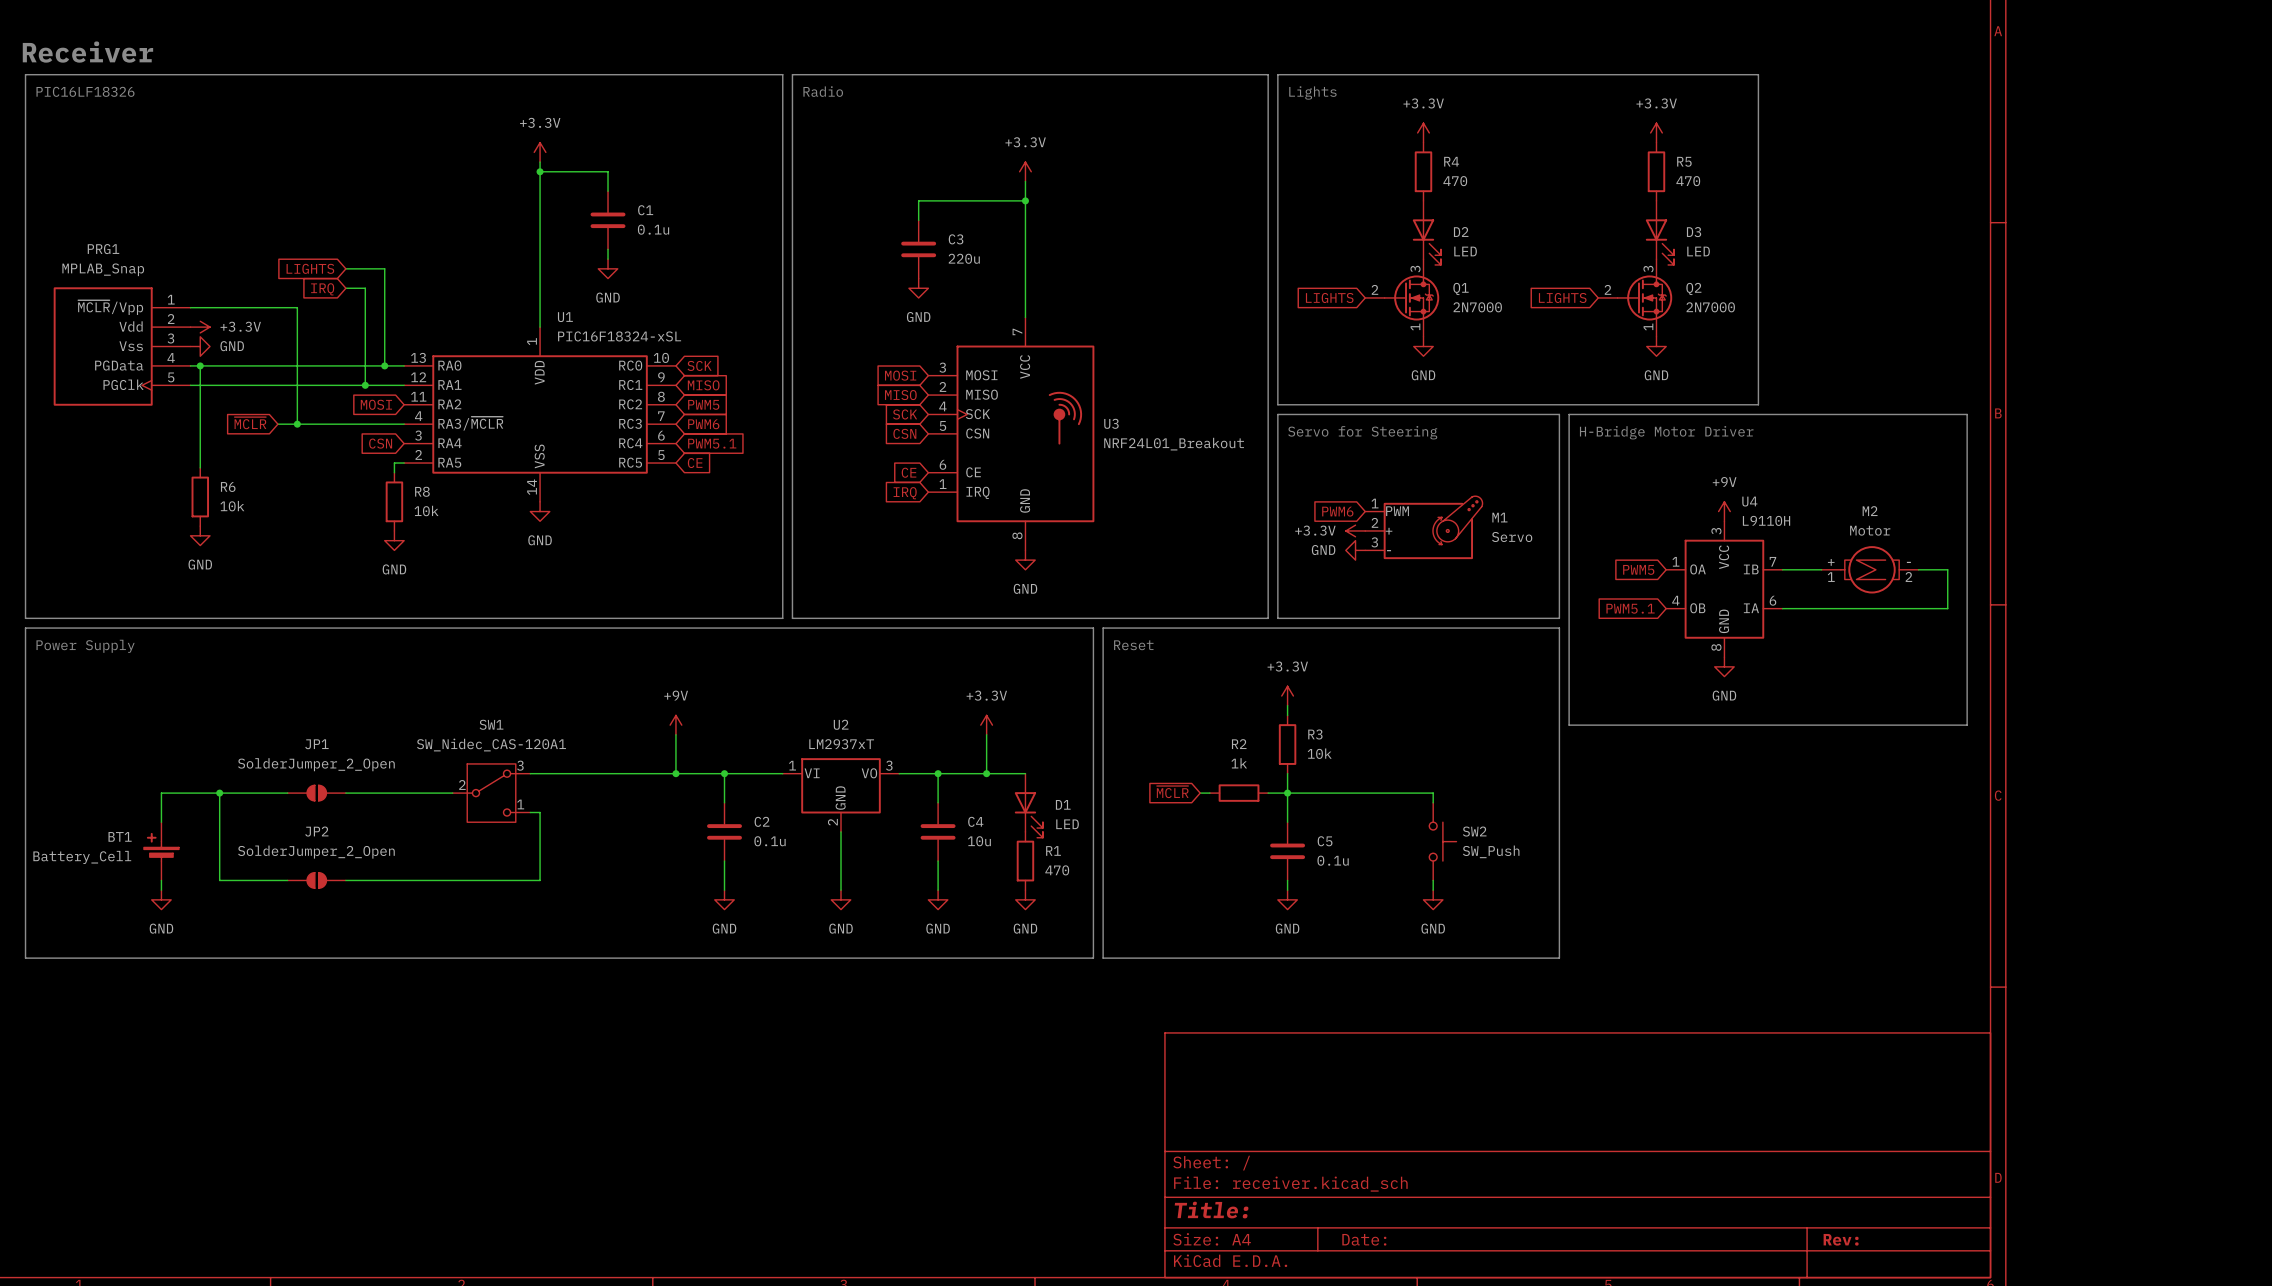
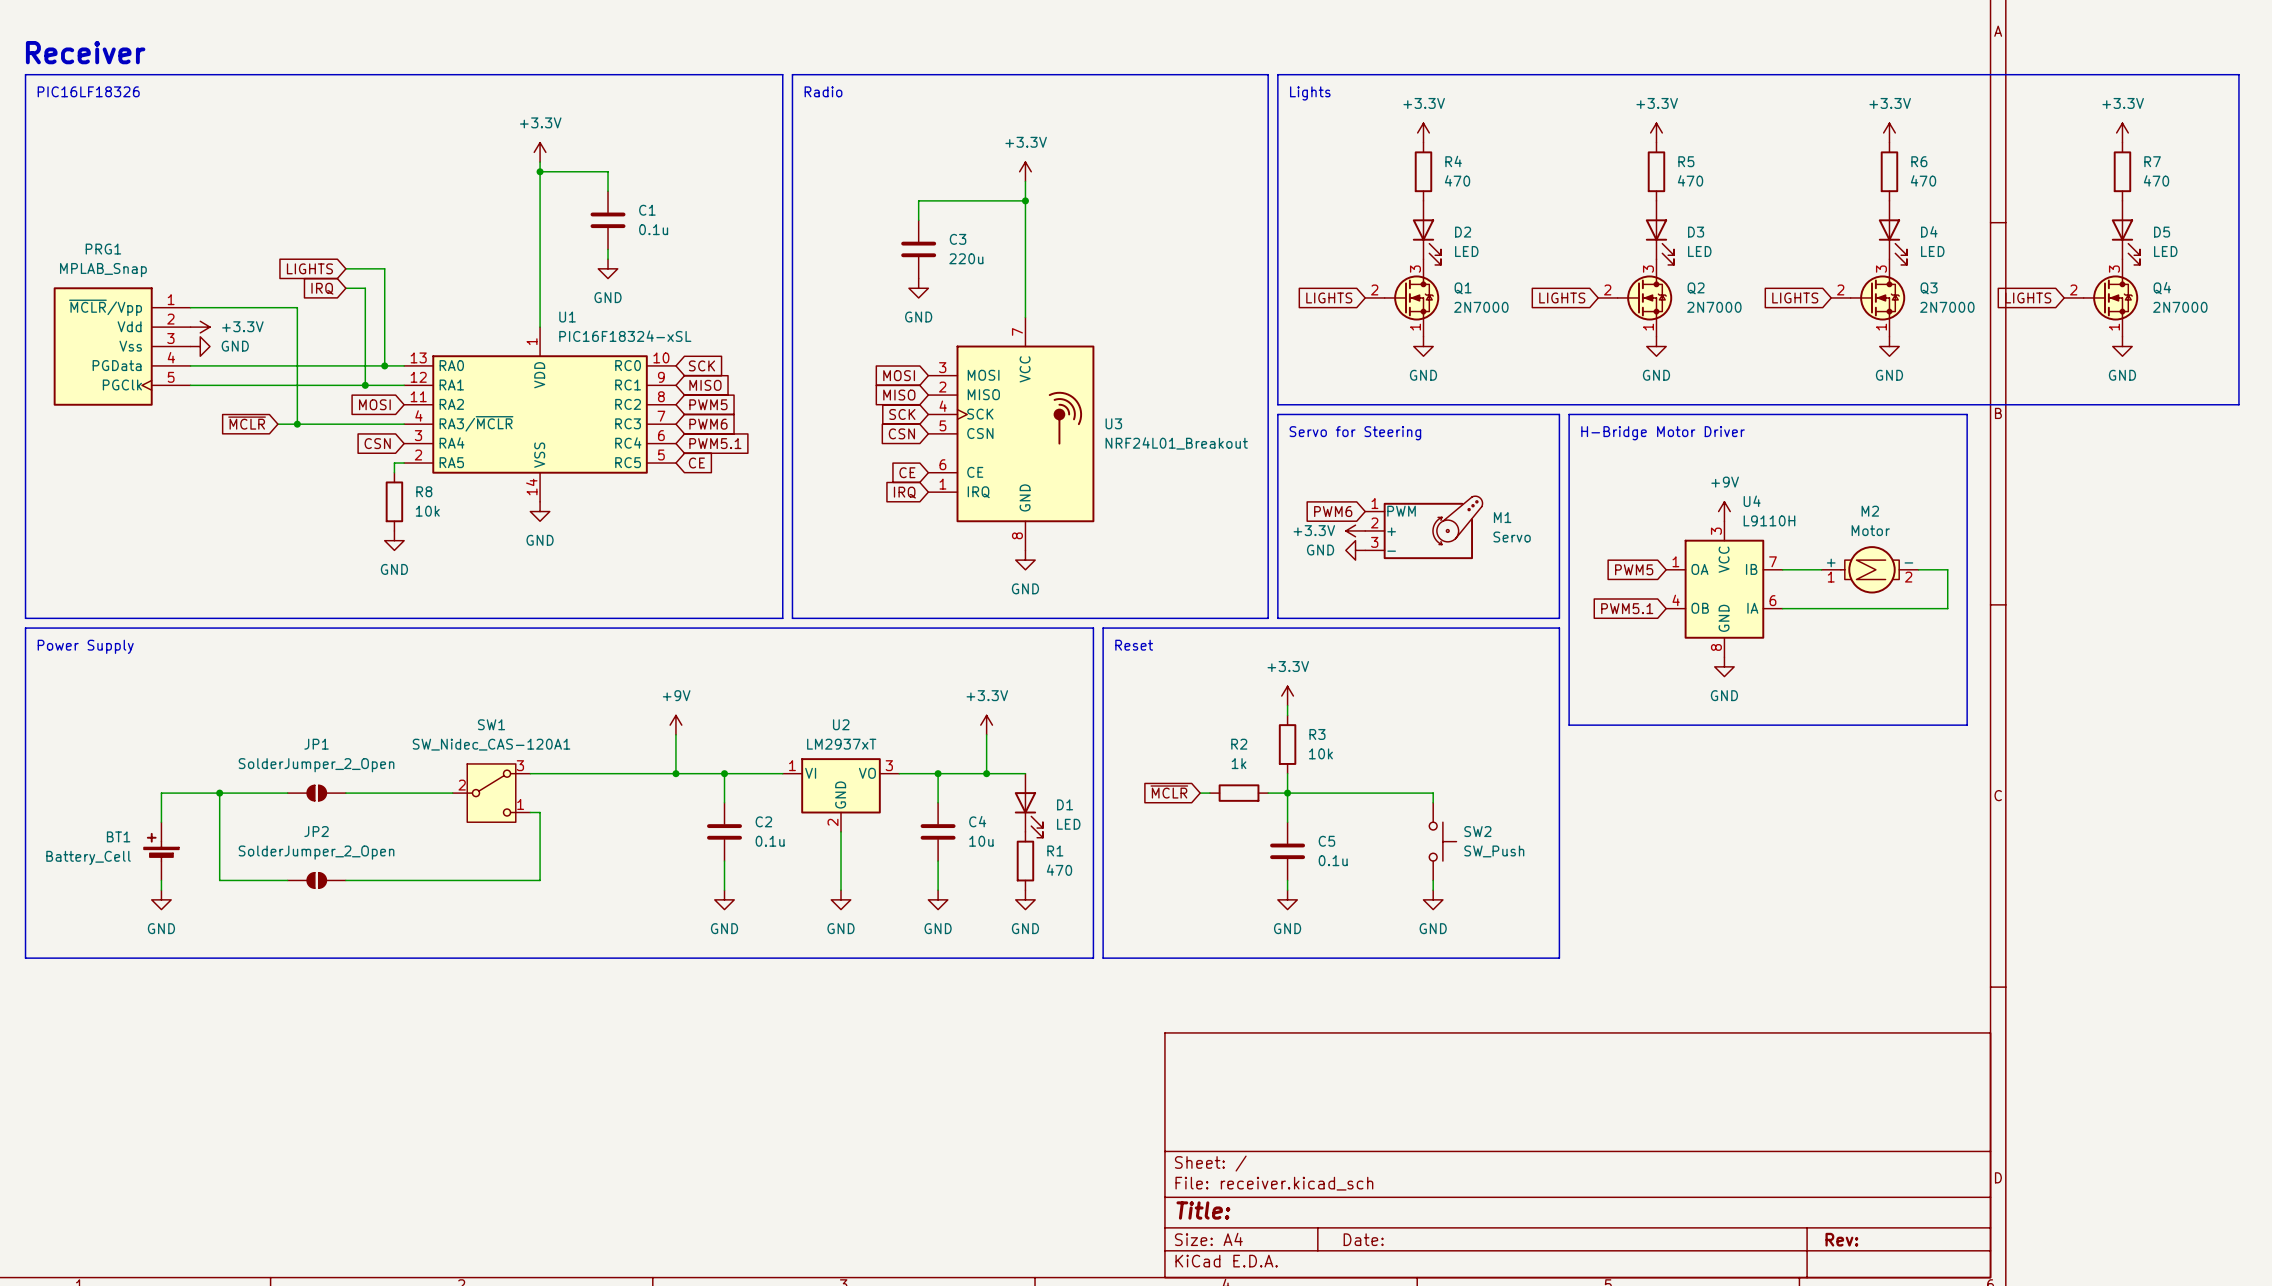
line: (1758, 74) (1758, 404) -> (1758, 74) (2238, 74) (2238, 404) (1758, 404)
power symbol: none -> +3.3V (1889, 132)
power symbol: none -> +3.3V (2122, 132)
R7: none -> 470 (2122, 171)
D4: none -> LED (1892, 232)
D5: none -> LED (2125, 232)
global label: none -> LIGHTS (1795, 297)
Q3: none -> 2N7000 (1868, 297)
global label: none -> LIGHTS (2028, 297)
Q4: none -> 2N7000 (2101, 297)
power symbol: none -> GND (1889, 346)
power symbol: none -> GND (2122, 346)
wire: (200, 365) (200, 467) -> none
junction: (200, 365) -> none
R6 position: (200, 496) -> (1889, 171)
R6 value: 10k (232, 506) -> 470 (1923, 180)
power symbol: GND (200, 535) -> none

